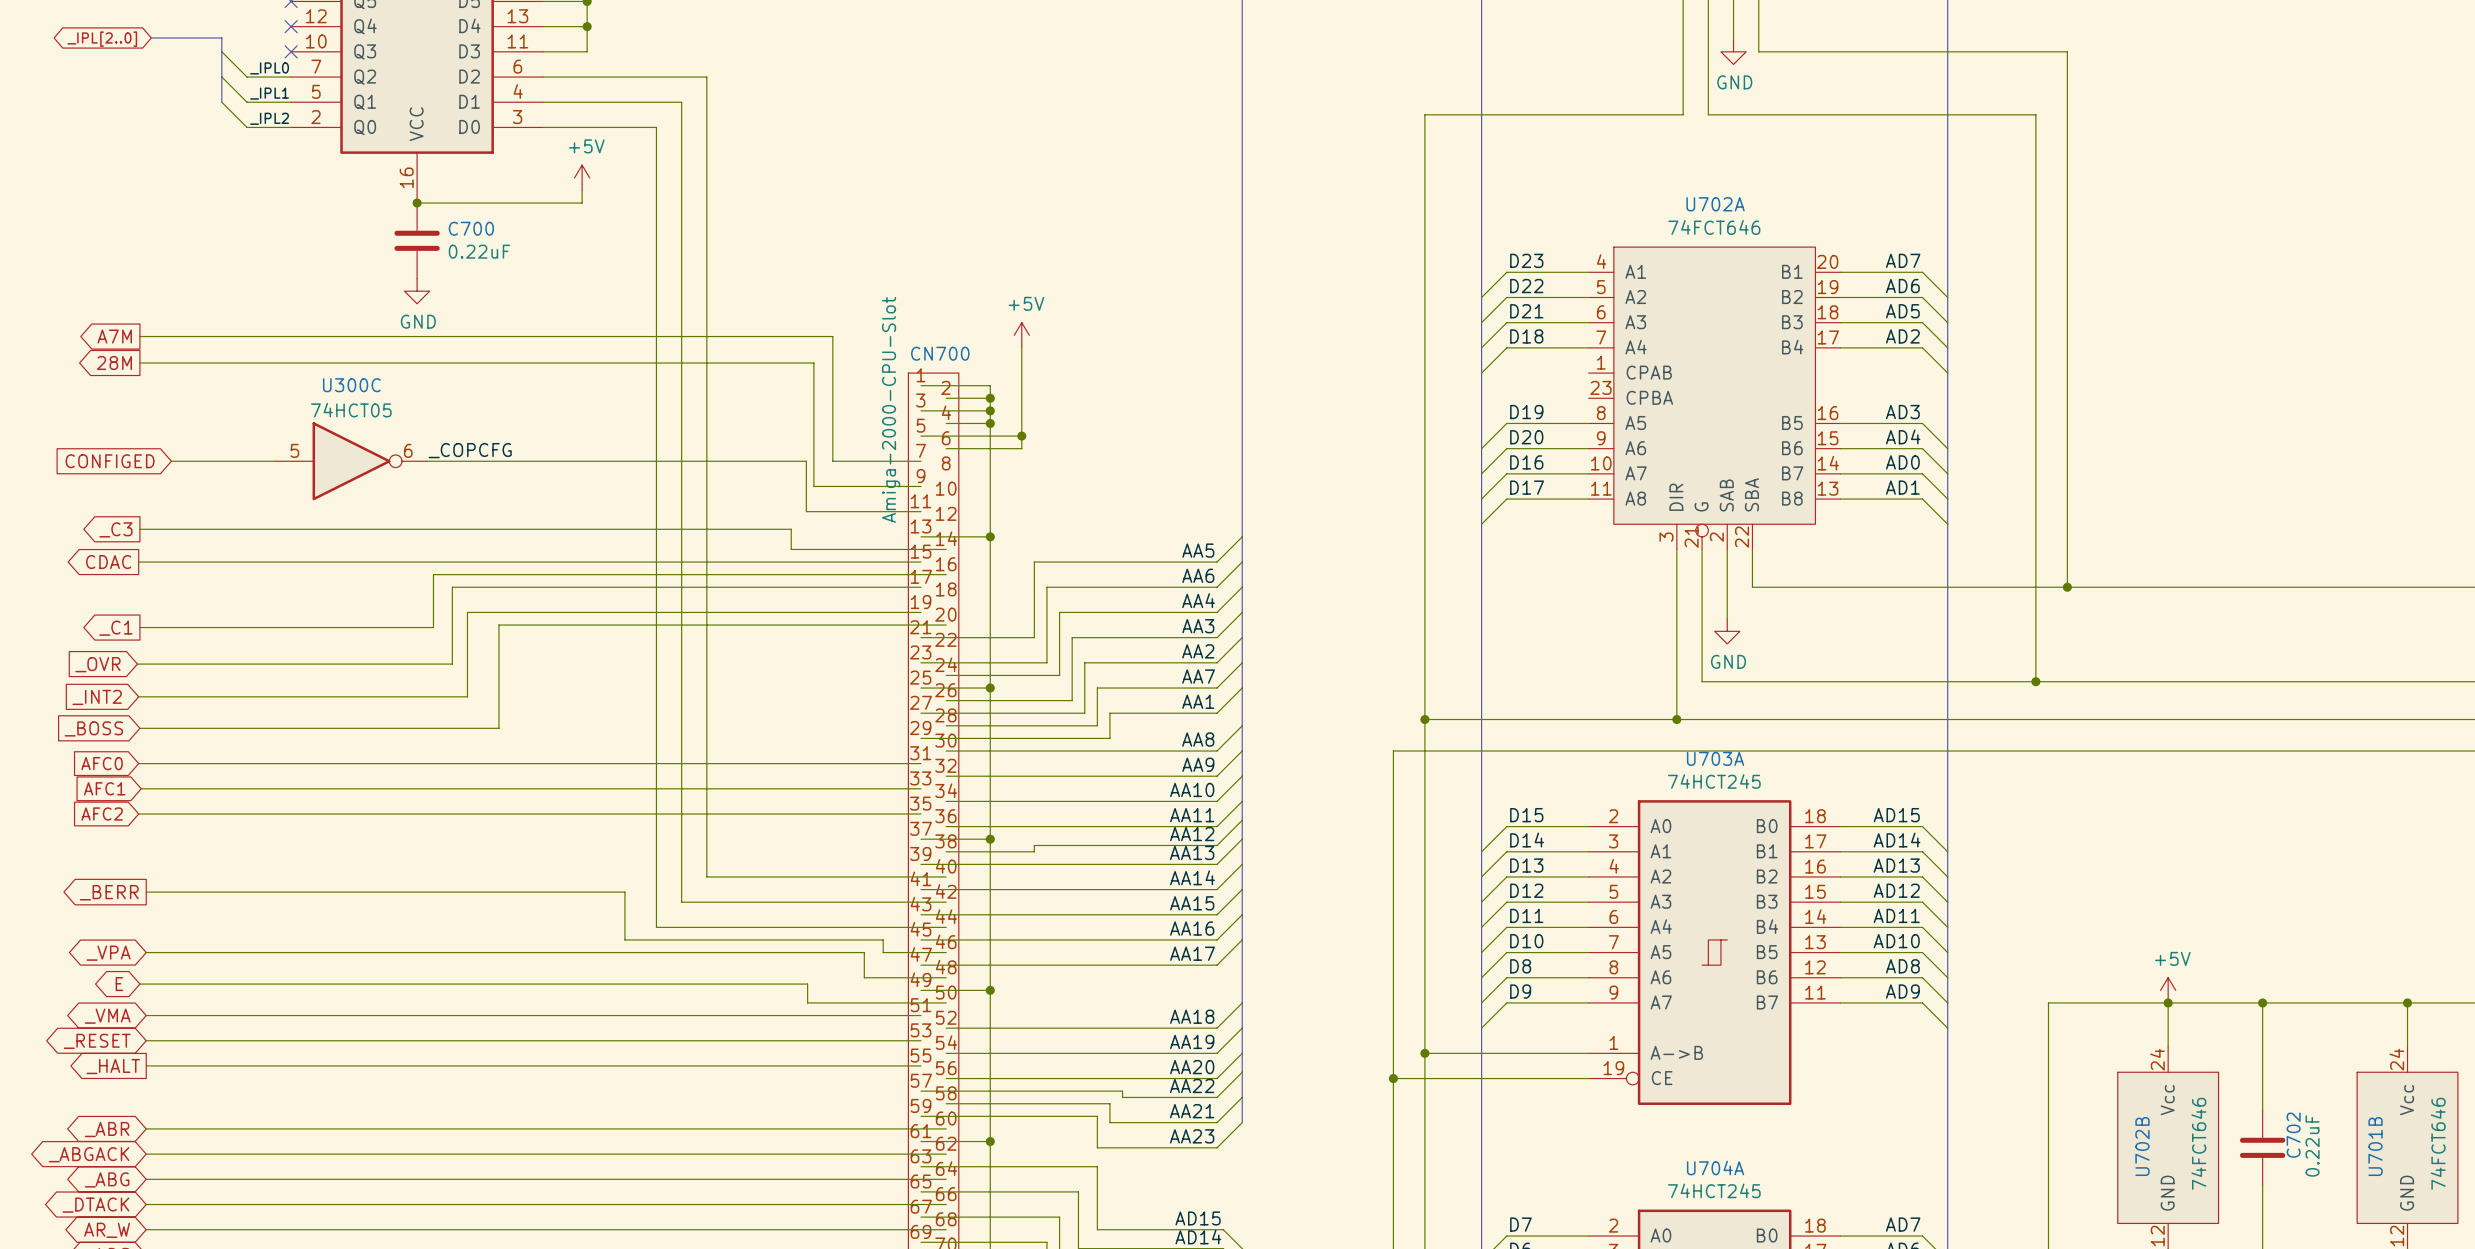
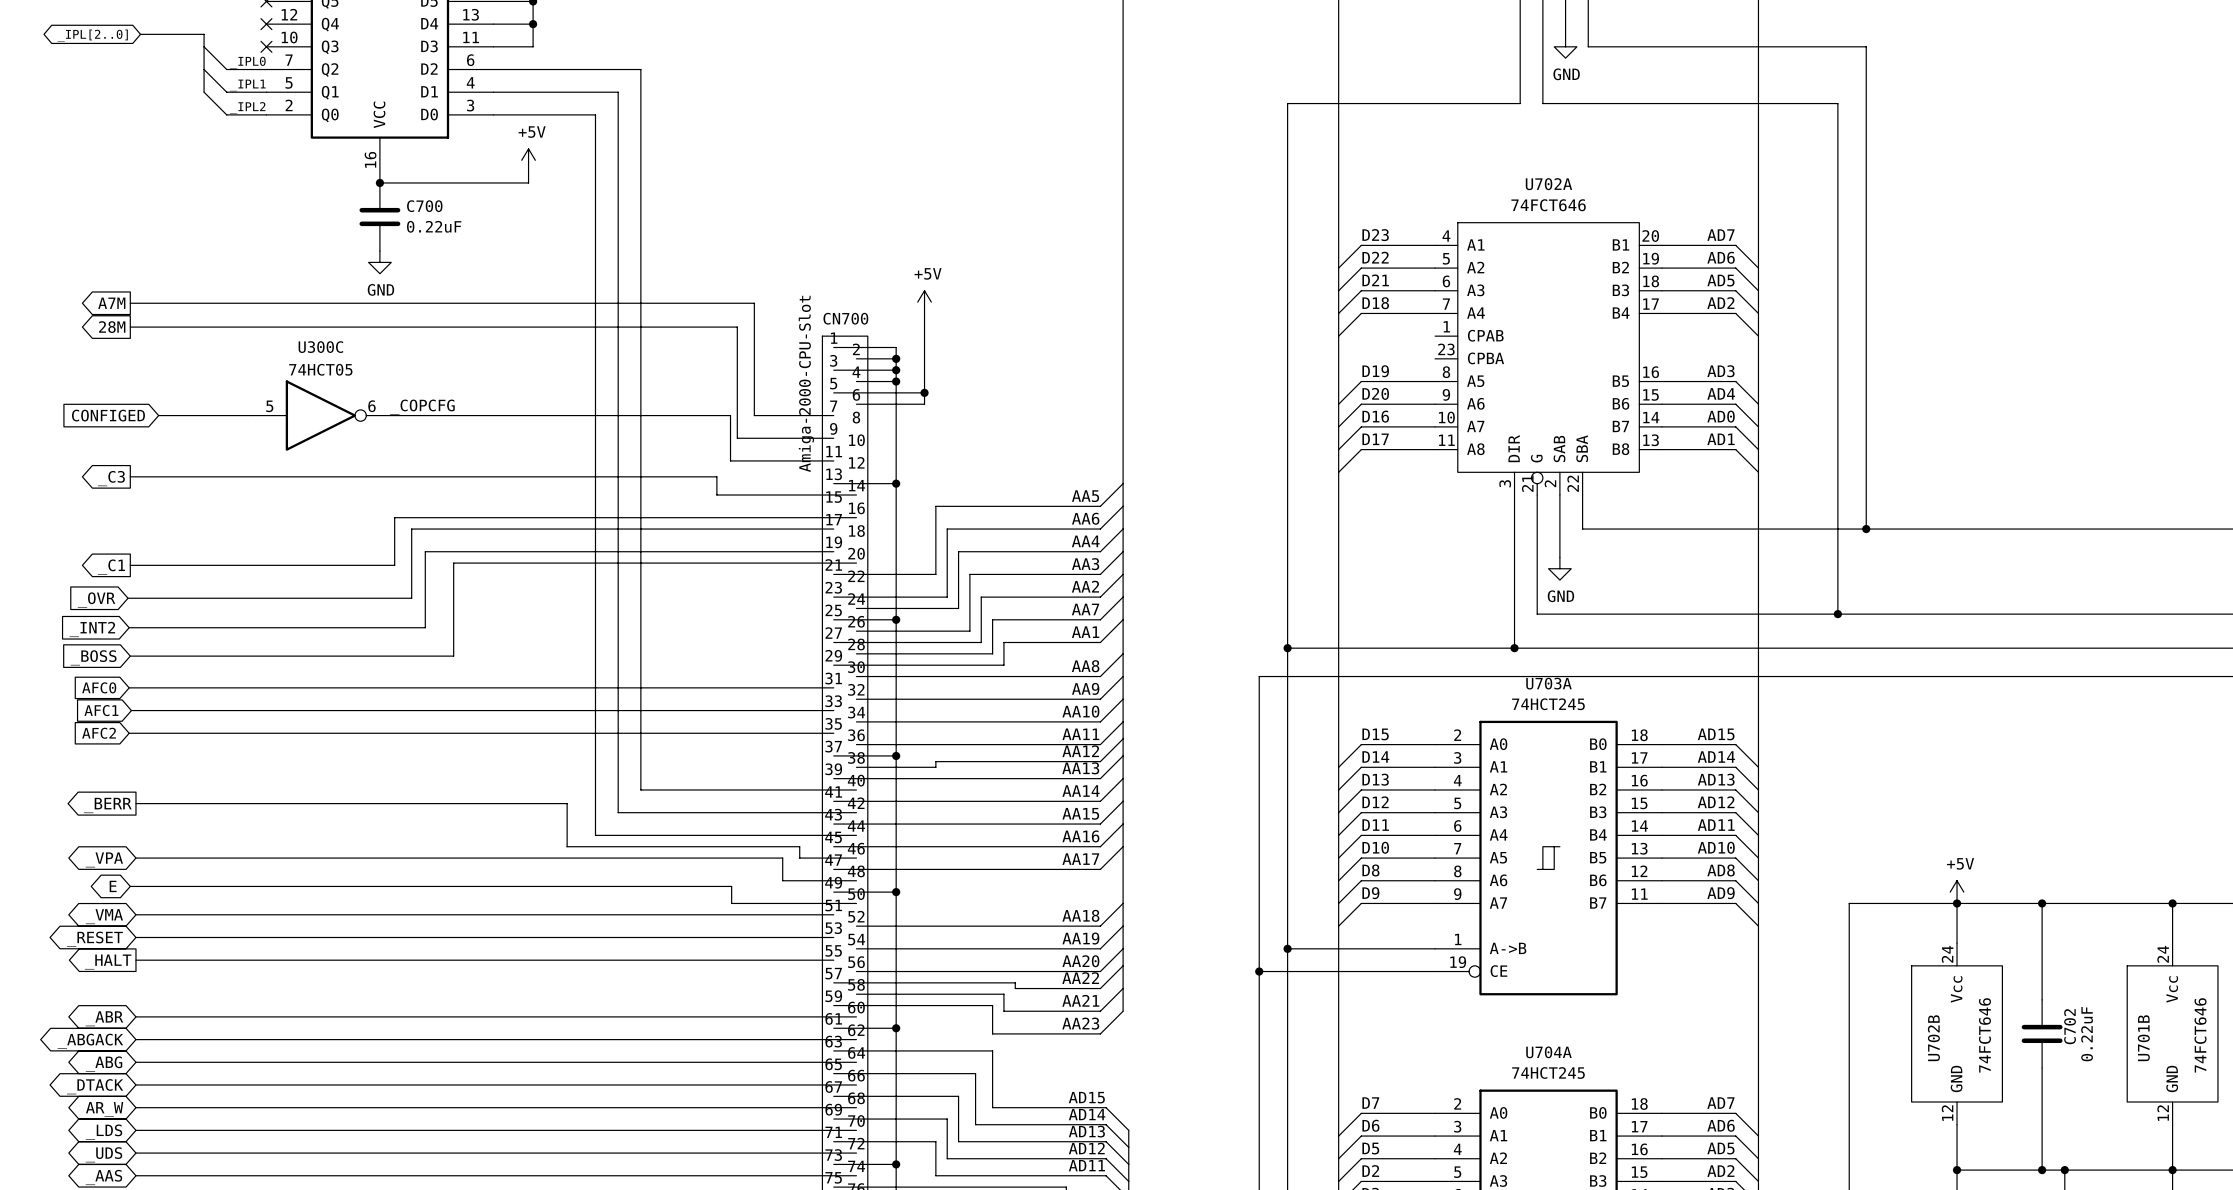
global label: CDAC (108, 562) -> none
wire: (138, 562) (921, 562) -> none

